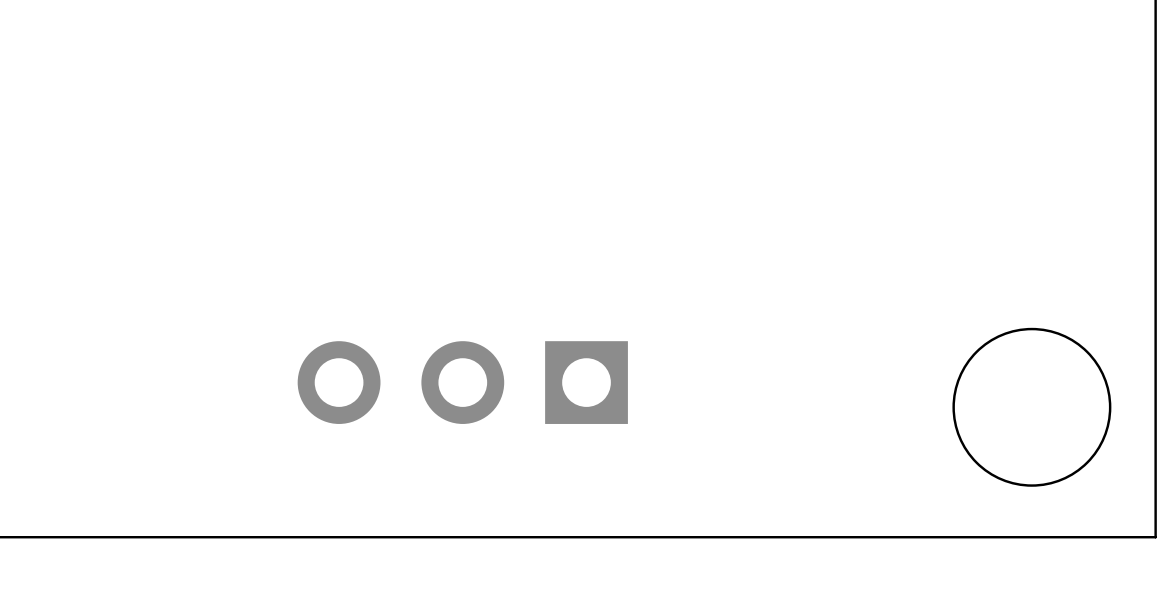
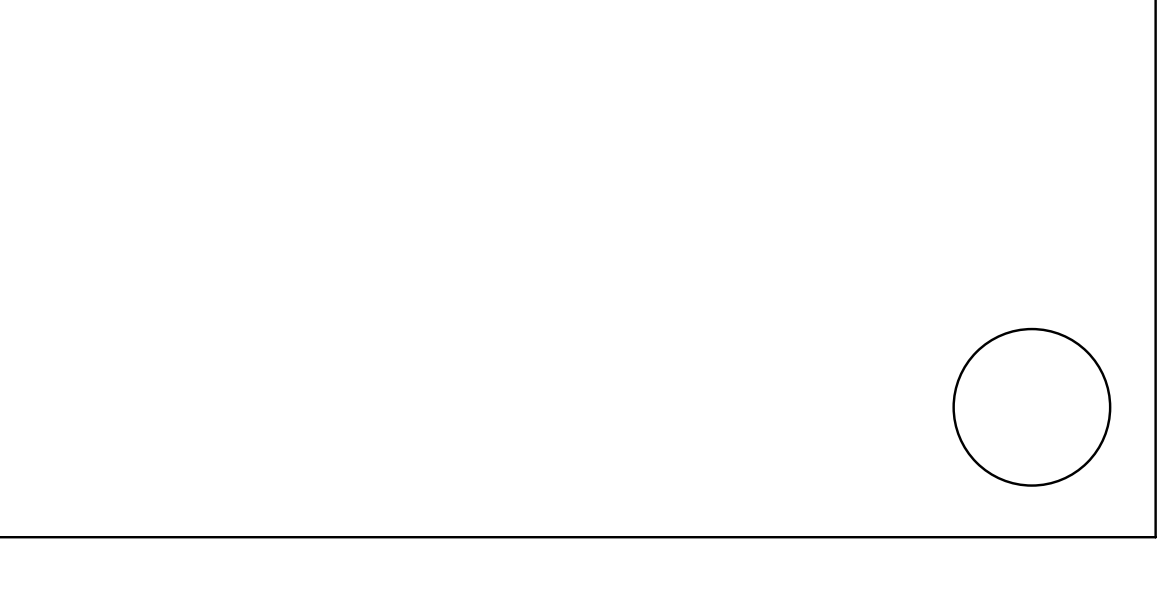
part: (462, 382) -> none

